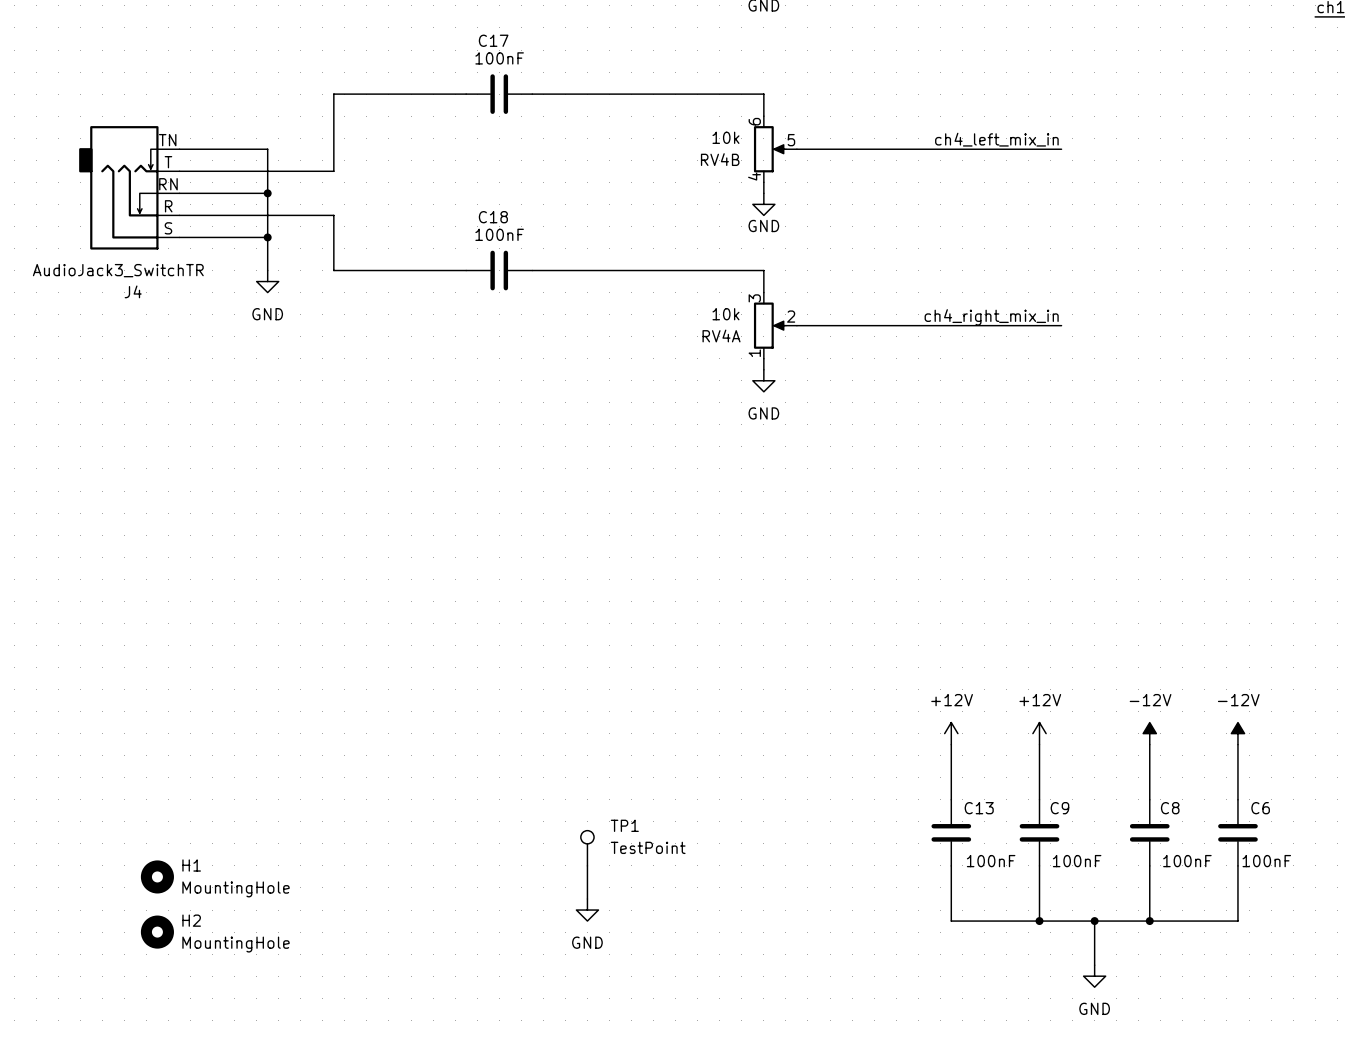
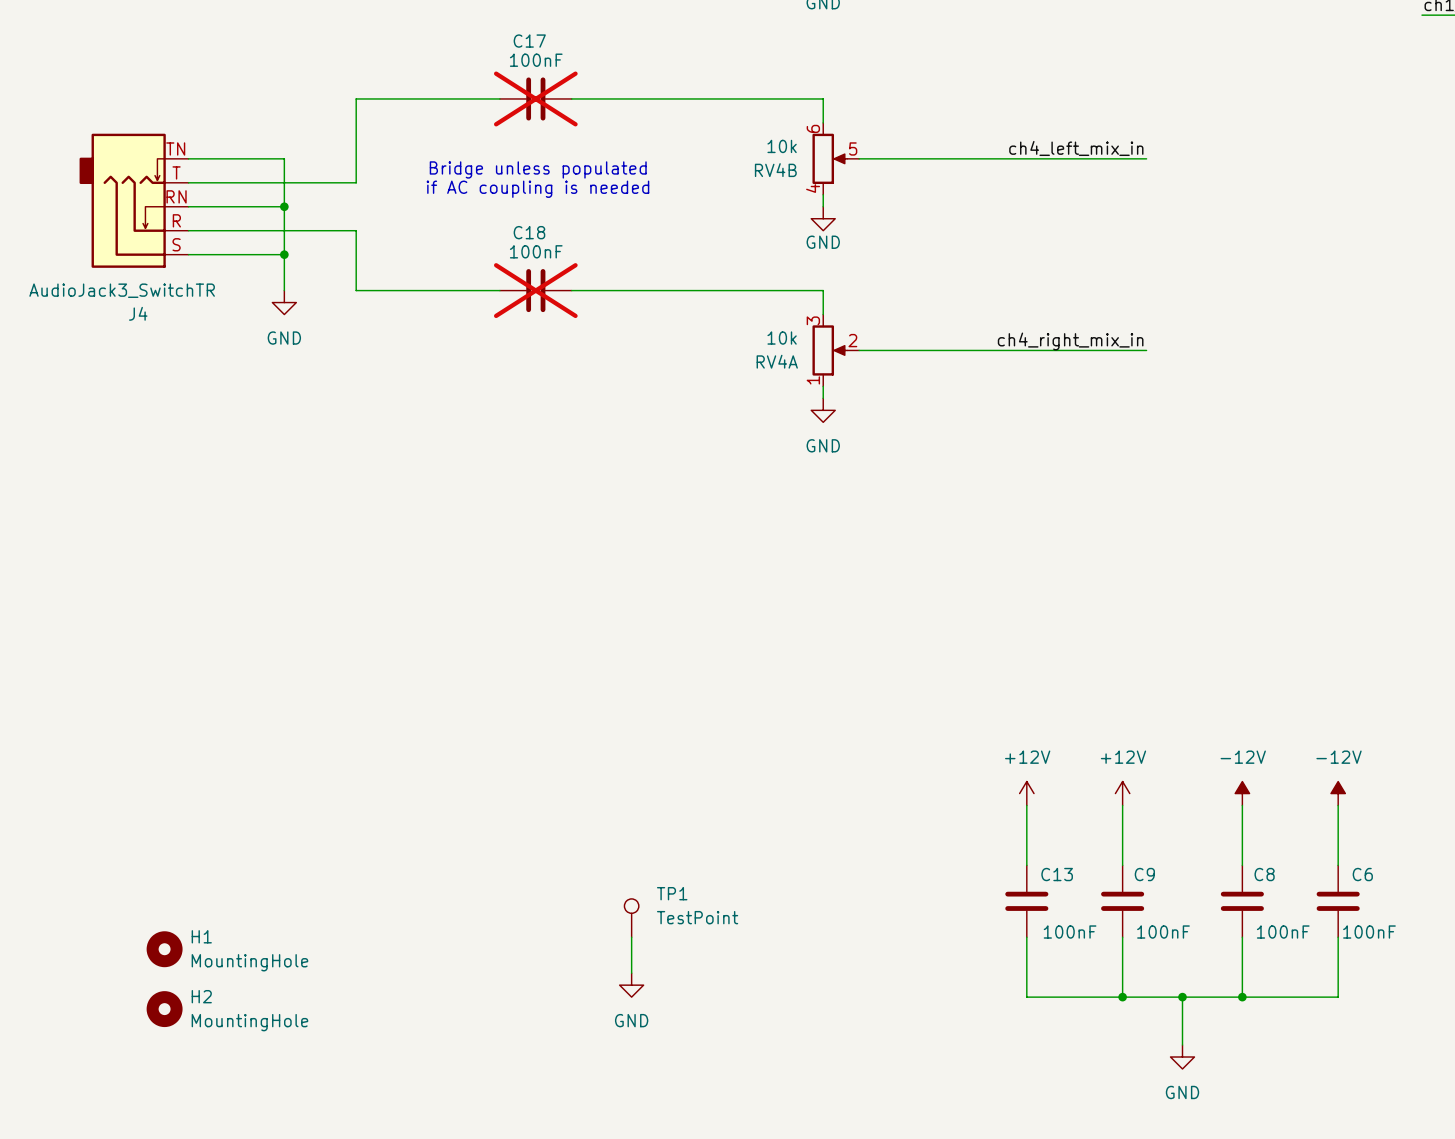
C17 do-not-place cross: none -> (535, 98)
text: none -> Bridge unless populated (538, 169)
text: none -> if AC coupling is needed (537, 189)
C18 do-not-place cross: none -> (535, 290)

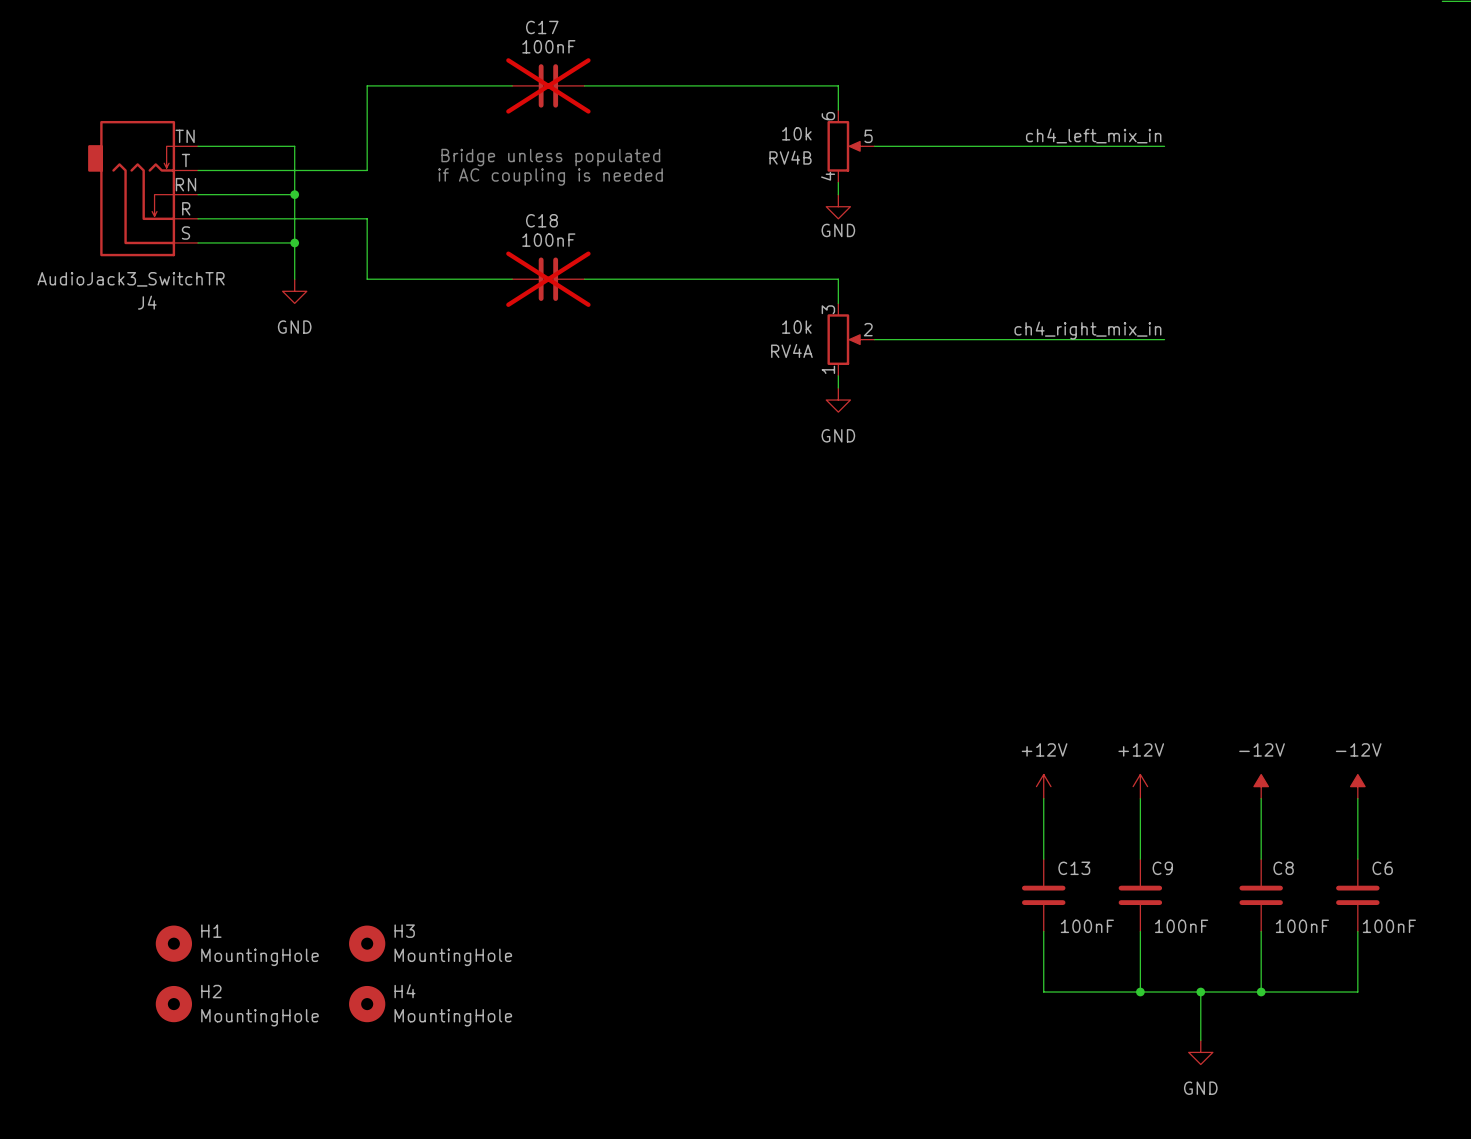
TP1: TestPoint (631, 918) -> none
wire: (631, 937) (631, 973) -> none
H3: none -> MountingHole (367, 943)
power symbol: GND (631, 985) -> none
H4: none -> MountingHole (367, 1004)

